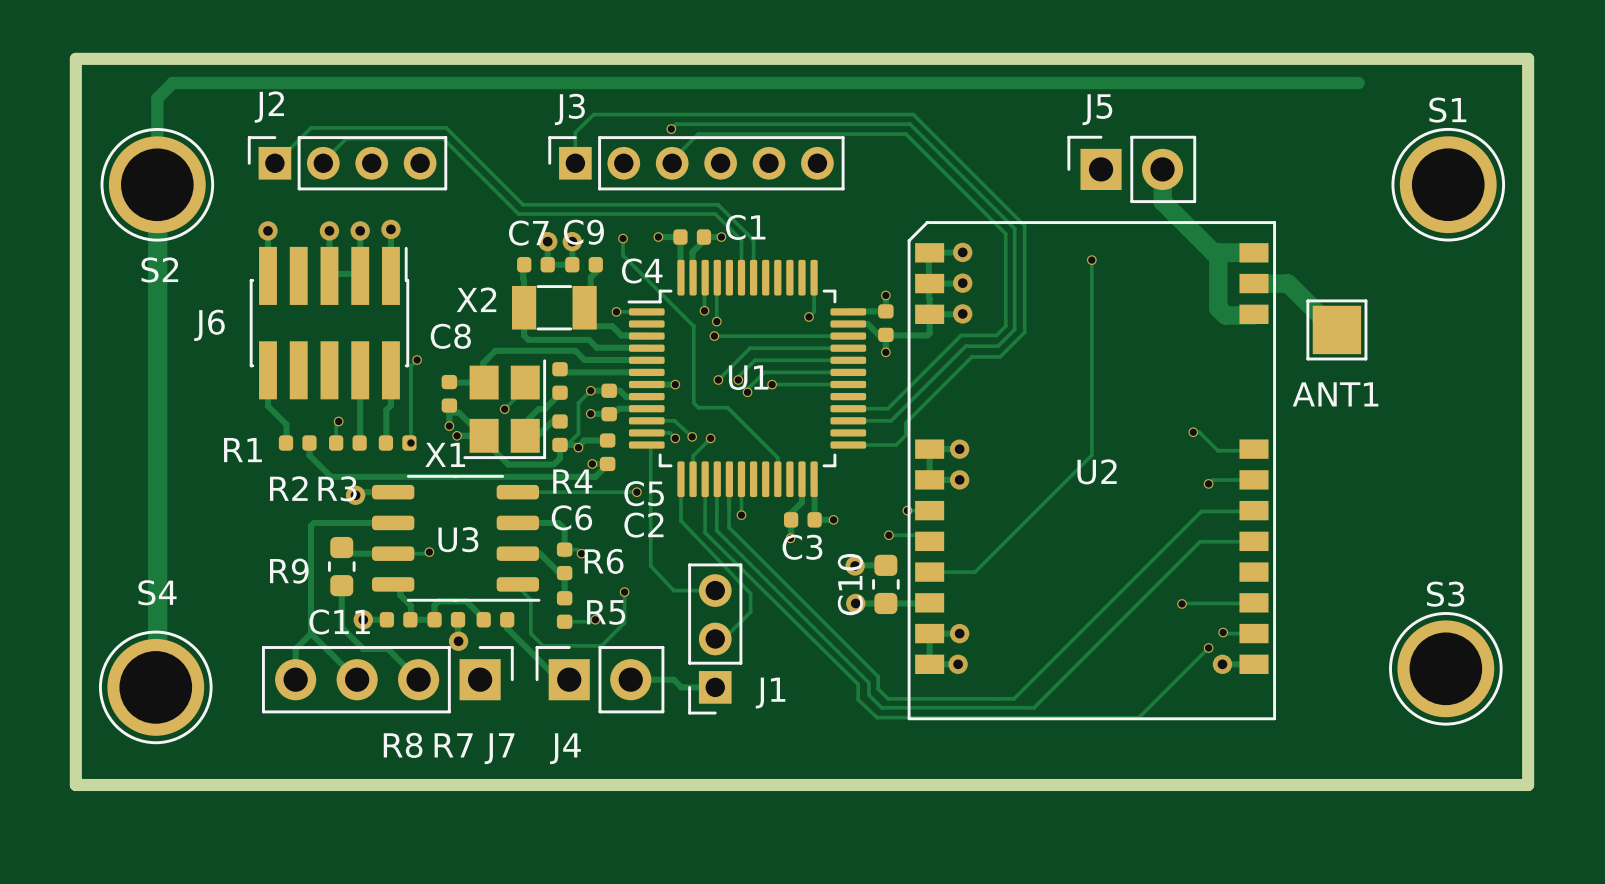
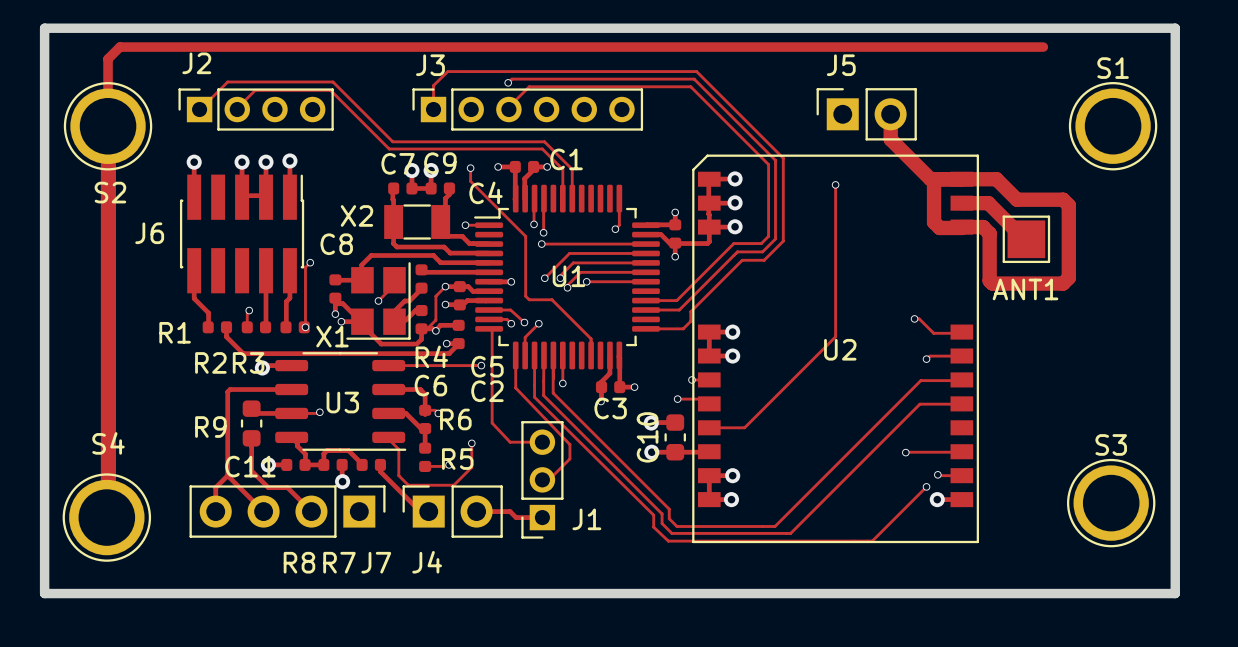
track: none -> (961, 179) (996, 179) (1016, 199) (1063, 199) (1068, 205) (1068, 277) (1063, 283) (992, 283) (989, 280) (989, 233) (983, 227) (960, 227)

